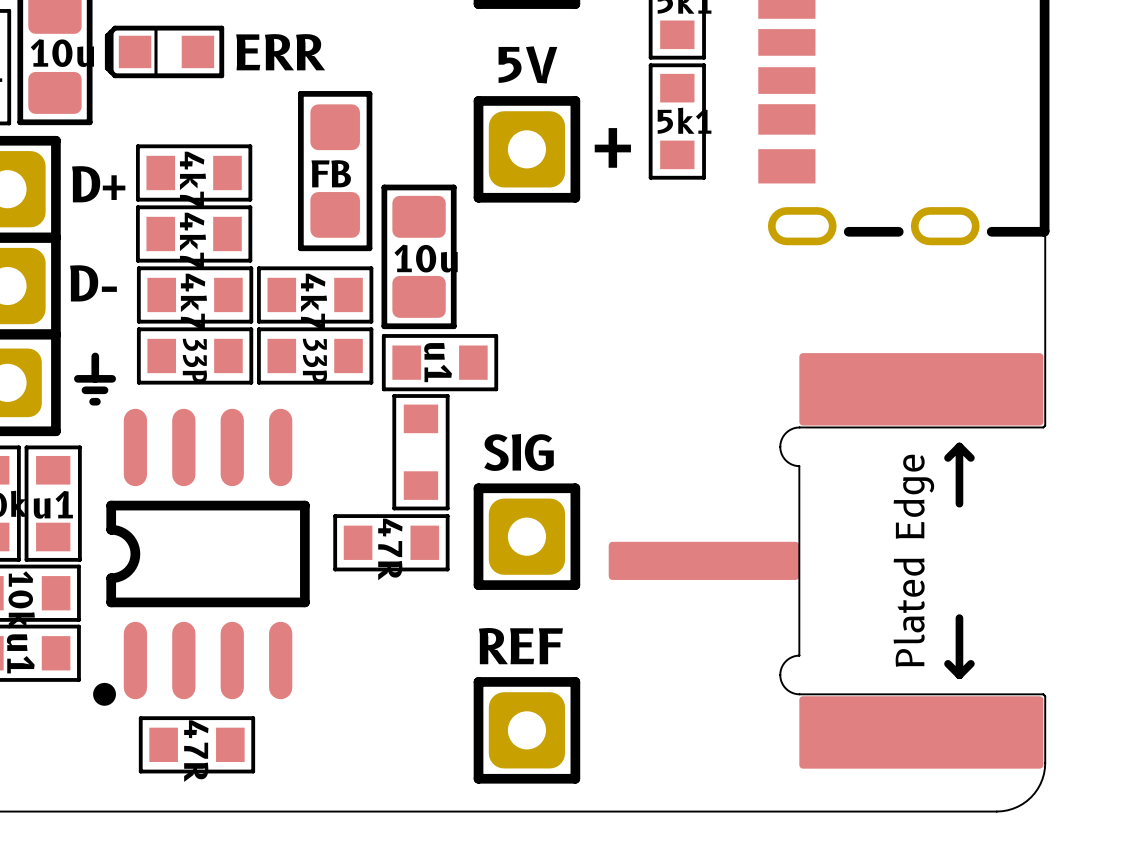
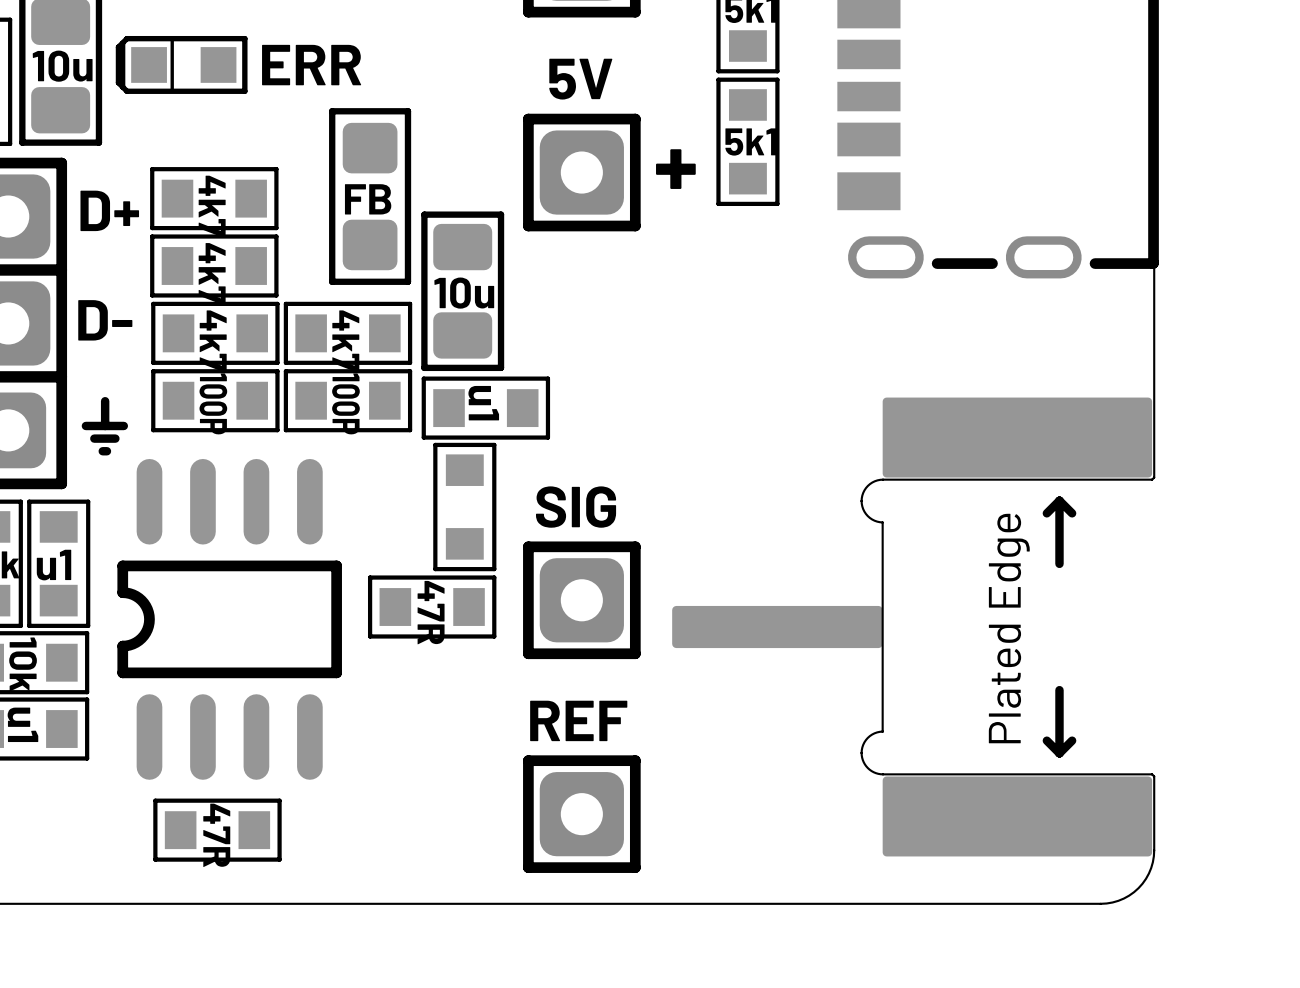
text: 33P (194, 361) -> 100P (213, 403)
text: 33P (314, 361) -> 100P (345, 403)
drawing: [93, 682, 116, 706] -> none

